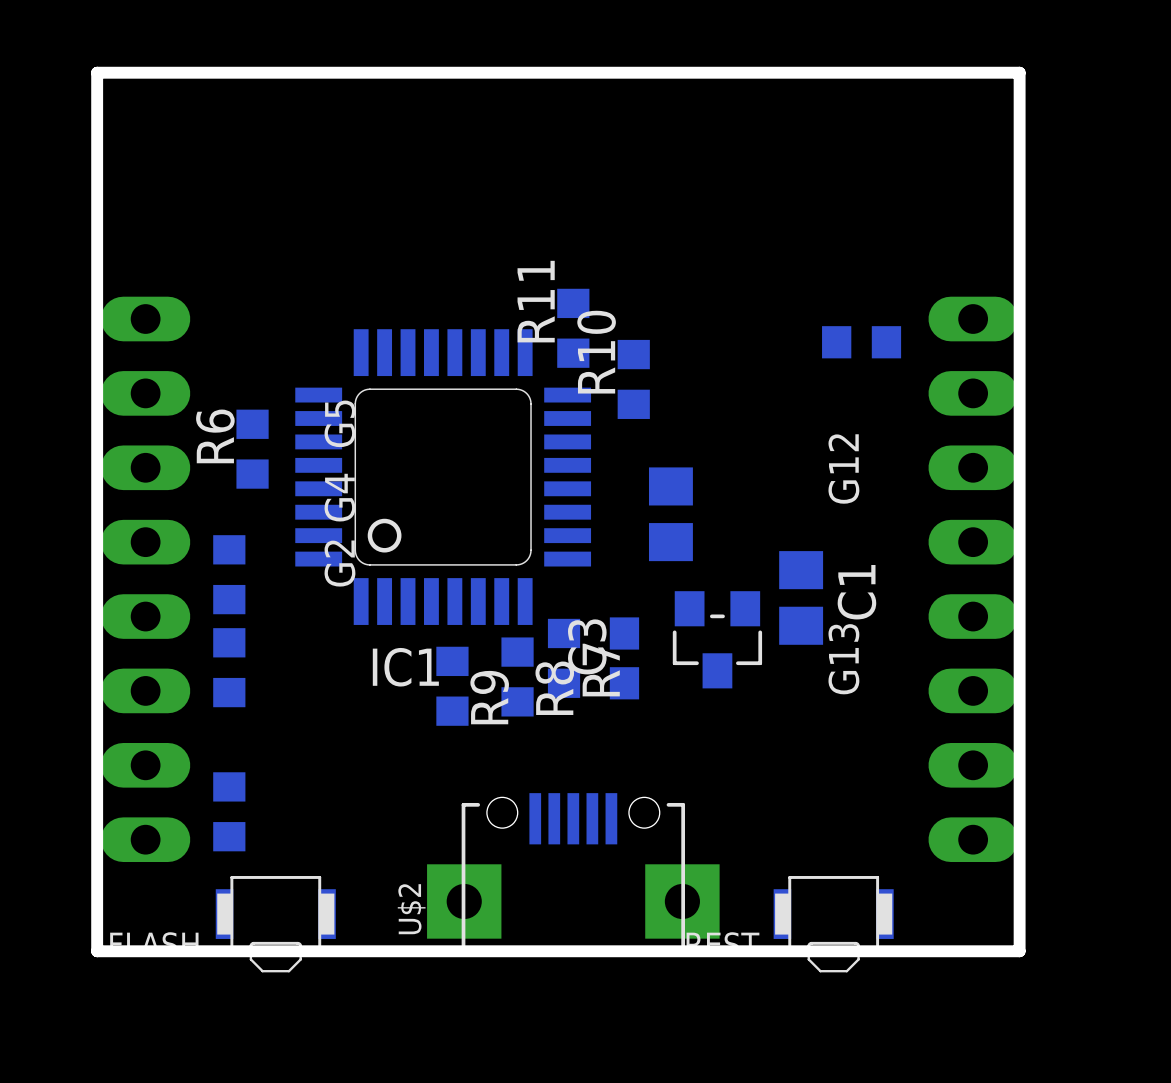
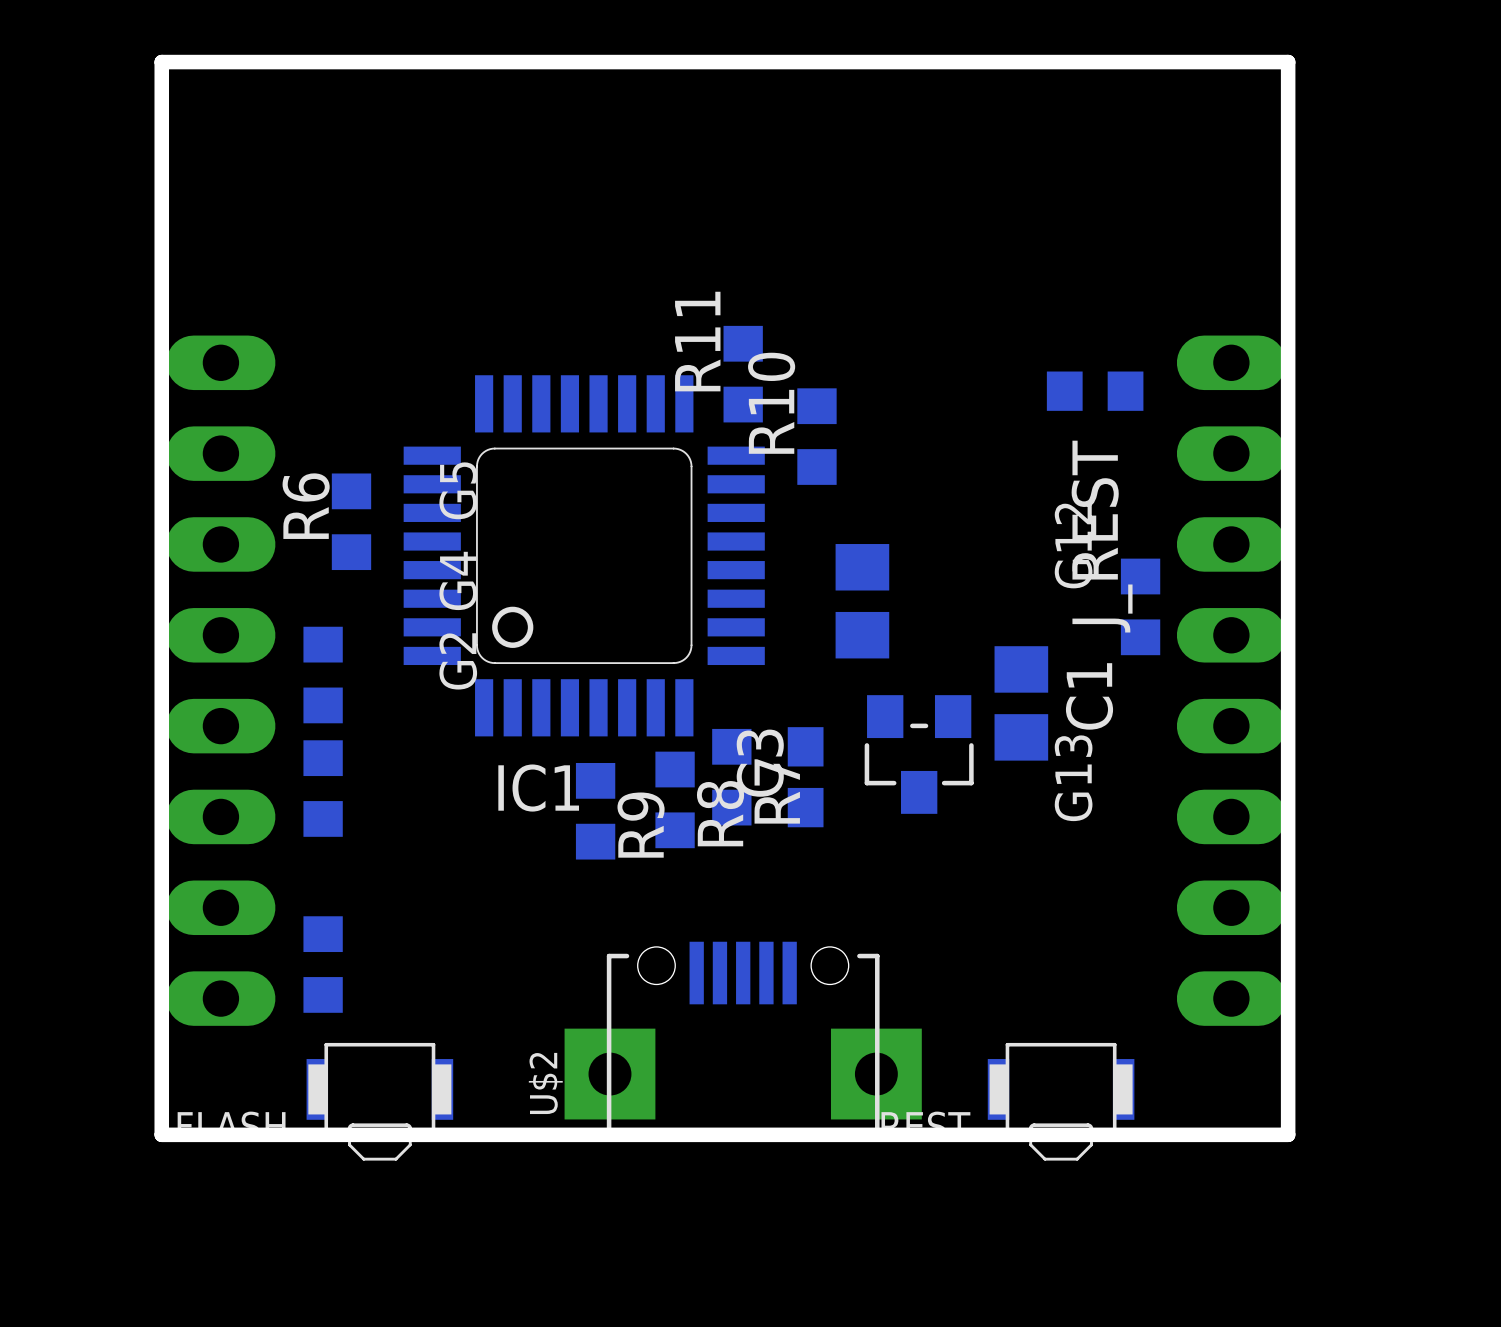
J_REST: none -> (1140, 606)

